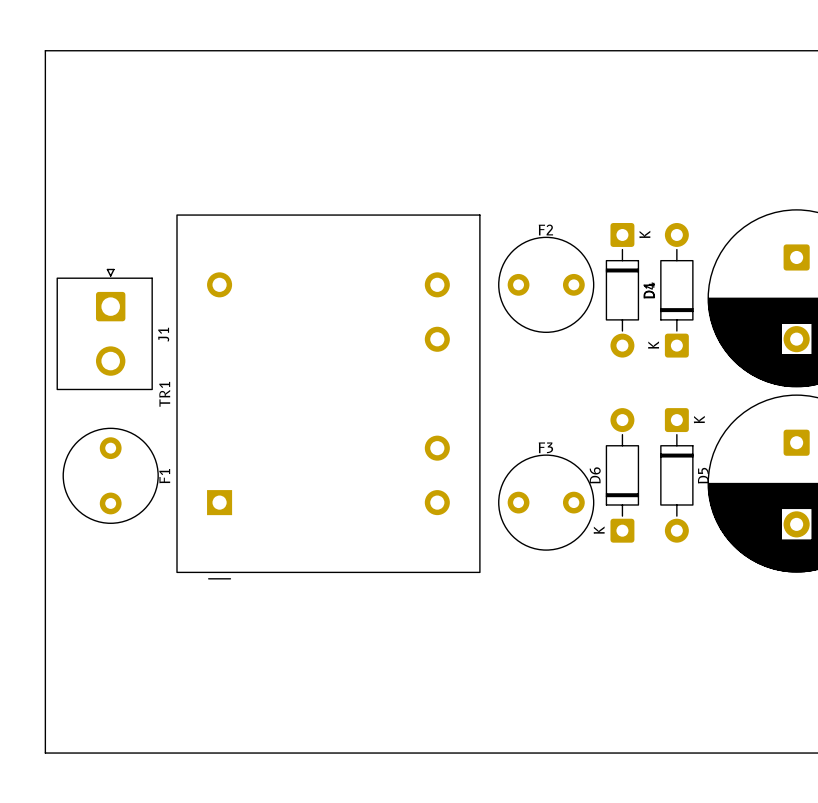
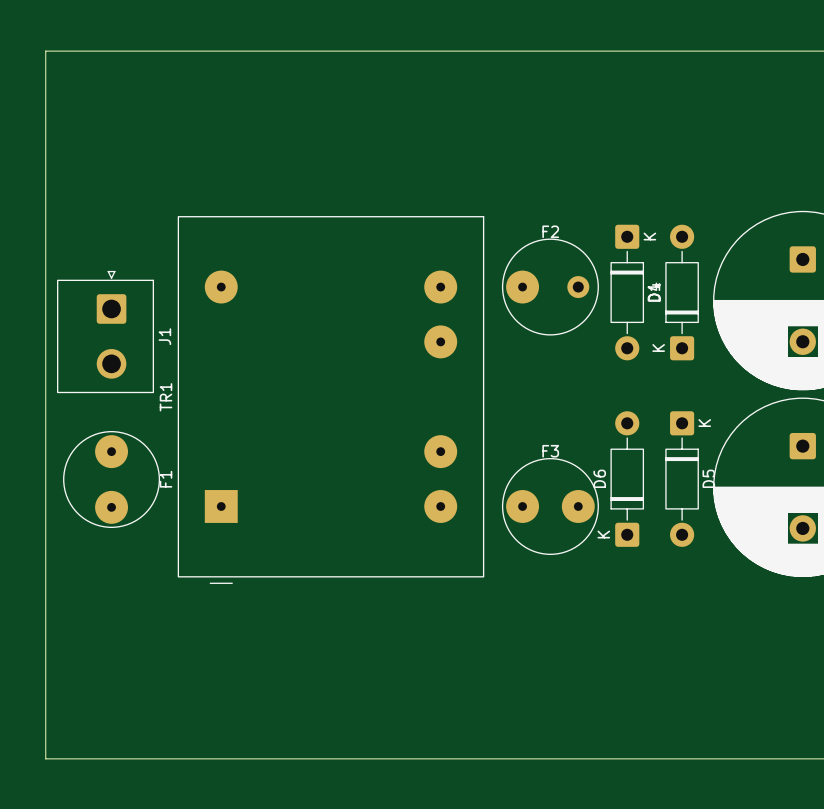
TR1 footprint: [176, 214, 481, 580] -> [177, 216, 485, 584]
F2 footprint: [498, 236, 595, 333] -> [501, 238, 599, 336]
F1 footprint: [62, 427, 159, 524] -> [63, 431, 161, 528]
F3 footprint: [498, 454, 595, 551] -> [501, 457, 599, 555]

